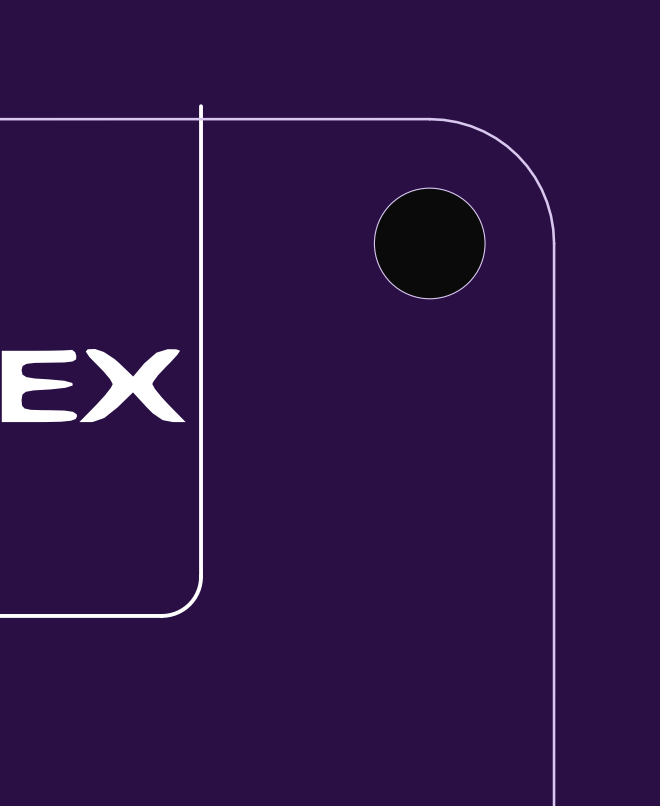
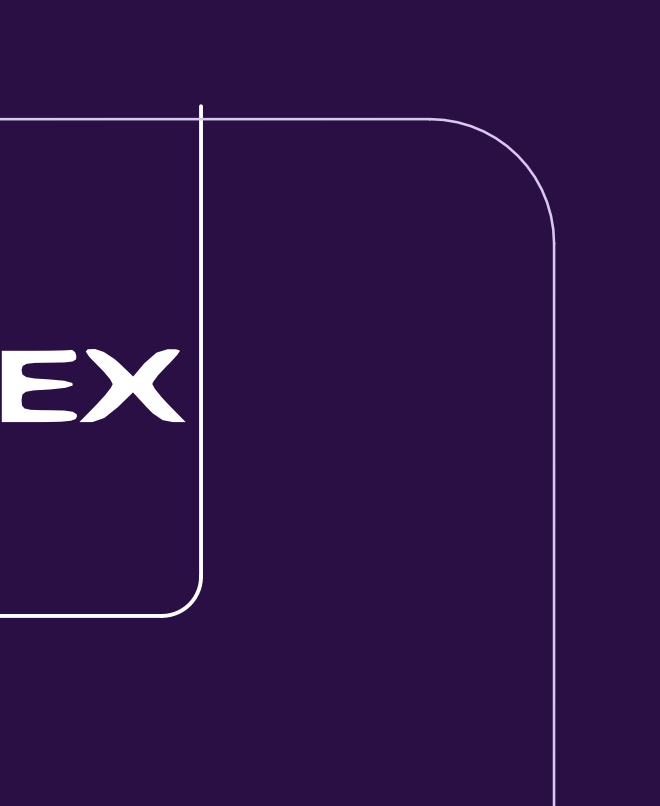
part: (429, 243) -> none

